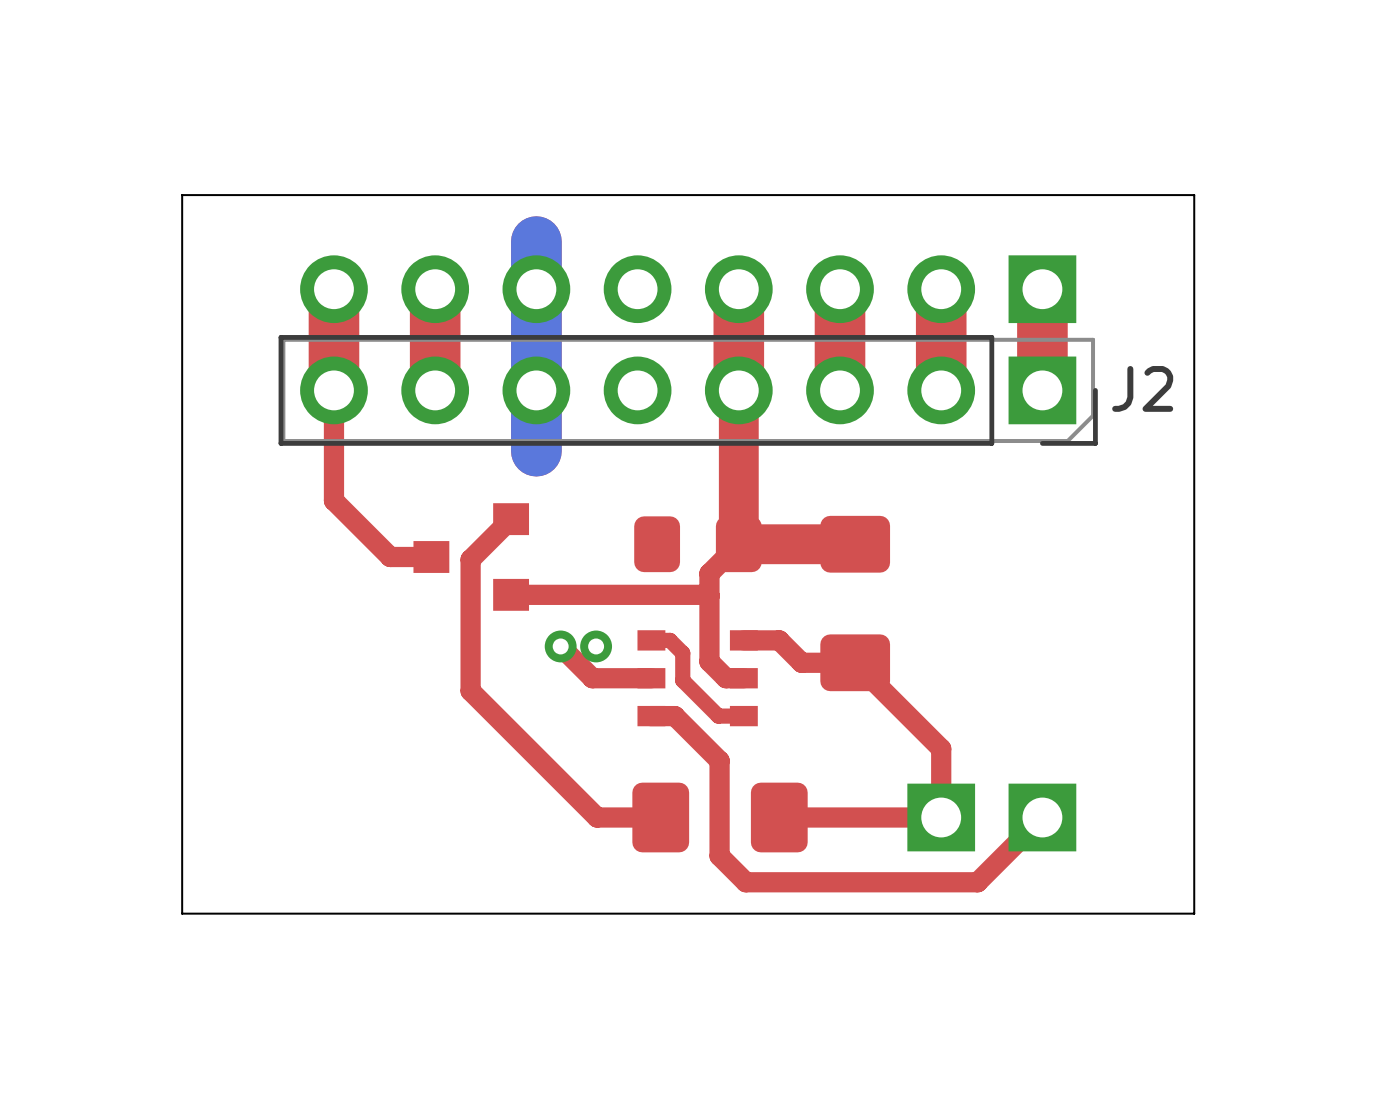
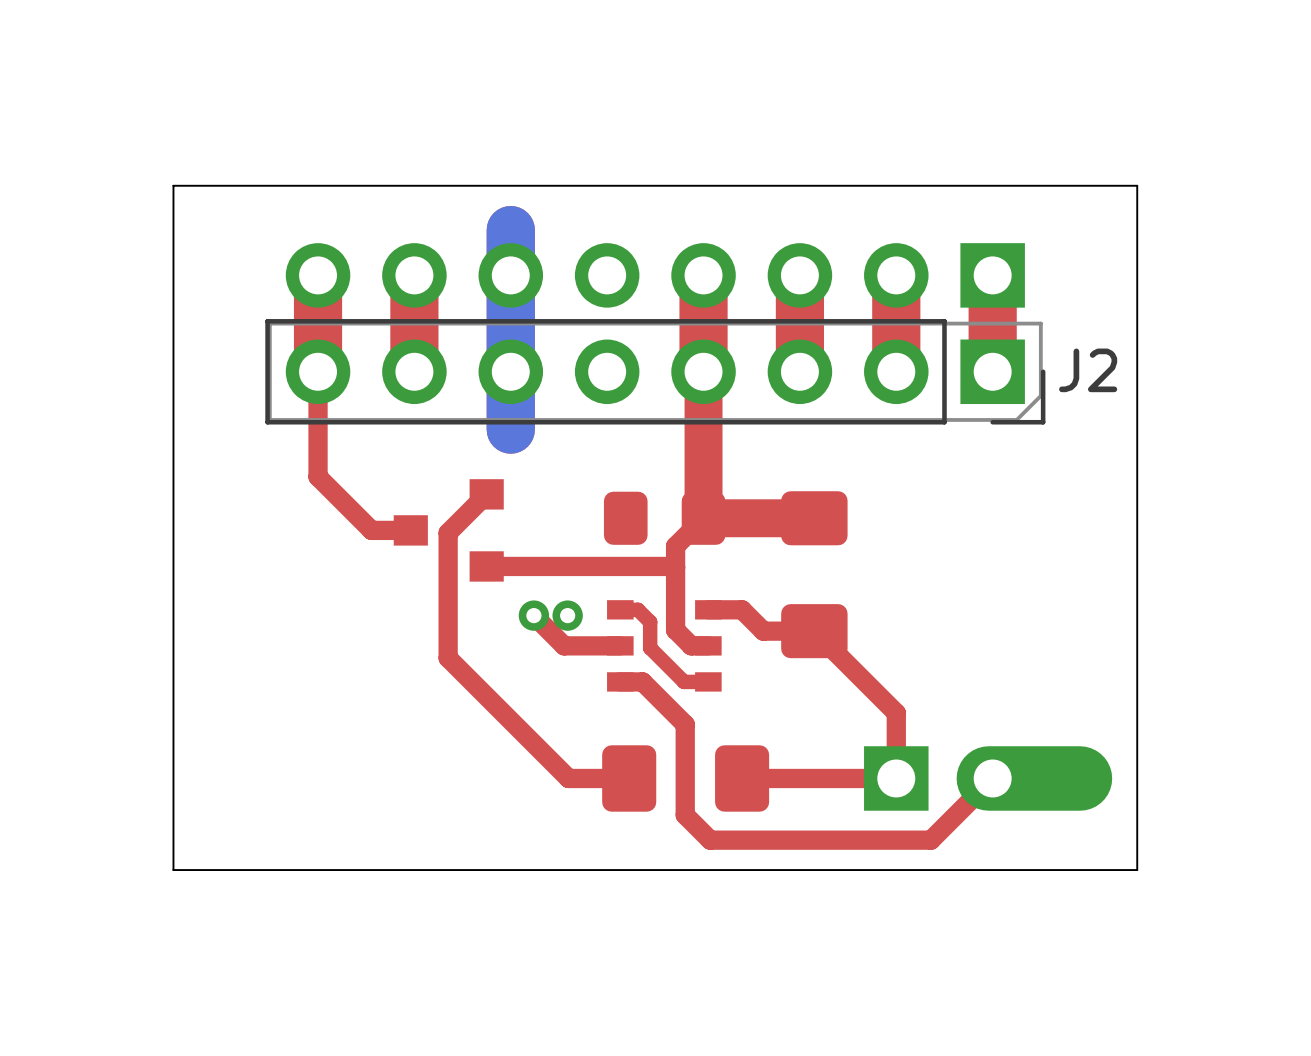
part: (1042, 817) -> none
part: none -> (1034, 778)

